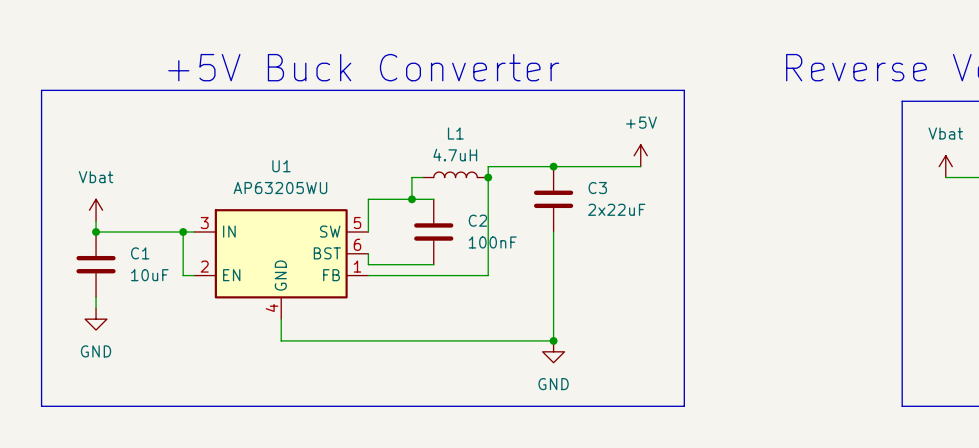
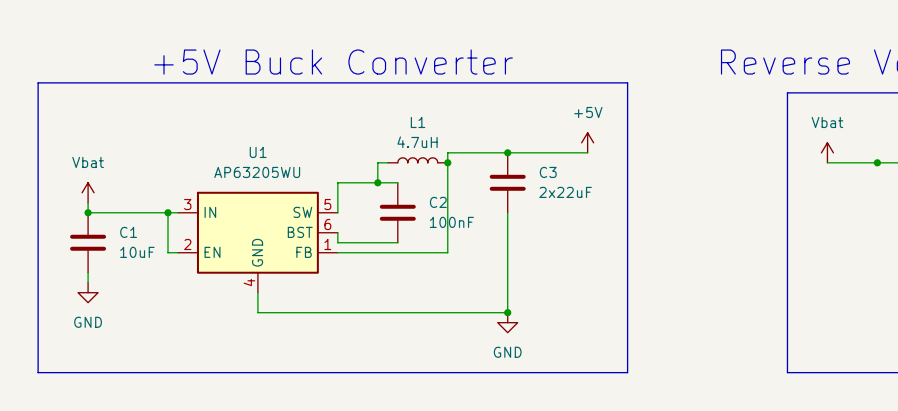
line: (902, 101) (902, 406) -> (827, 92) (787, 92) (787, 372) (827, 372)
power symbol position: Vbat (945, 166) -> Vbat (827, 152)
wire: none -> (827, 162) (867, 162)
junction: none -> (877, 162)

